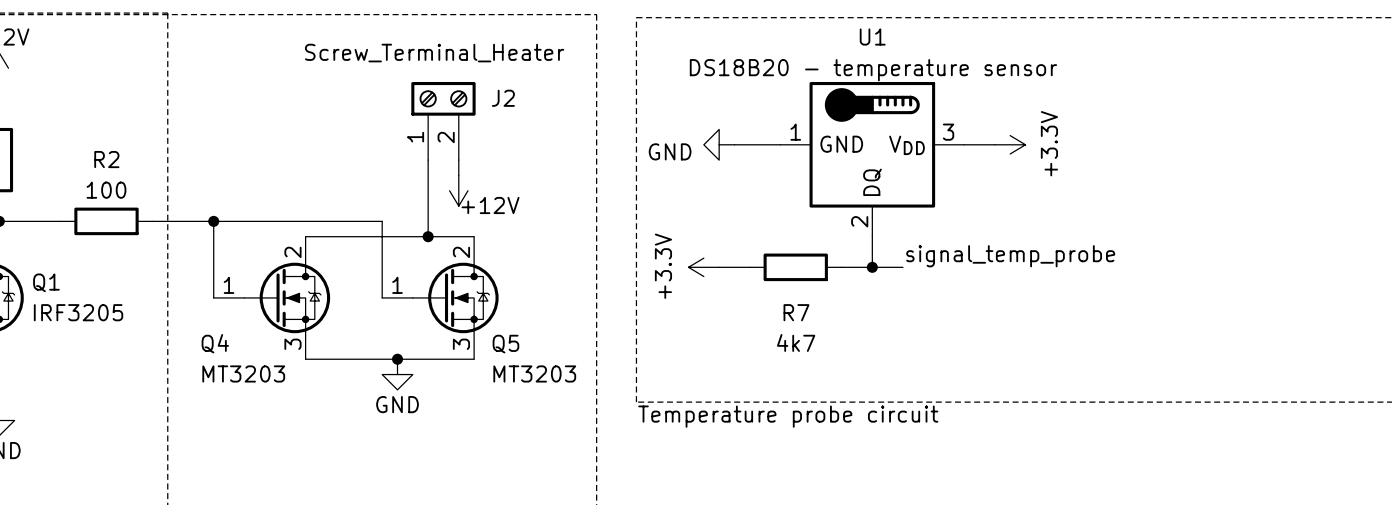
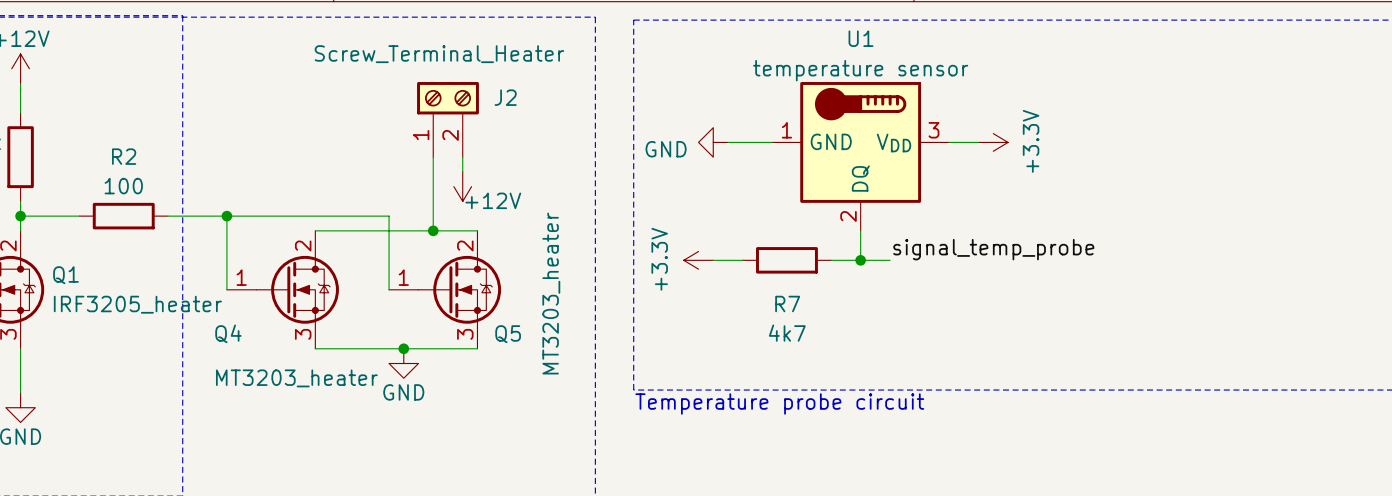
U1 value: DS18B20 - temperature sensor (873, 70) -> temperature sensor (860, 70)
Q1 value: IRF3205 (78, 312) -> IRF3205_heater (137, 304)
Q4 value: MT3203 (243, 373) -> MT3203_heater (296, 378)
Q5 value: MT3203 (534, 373) -> MT3203_heater (551, 293)

